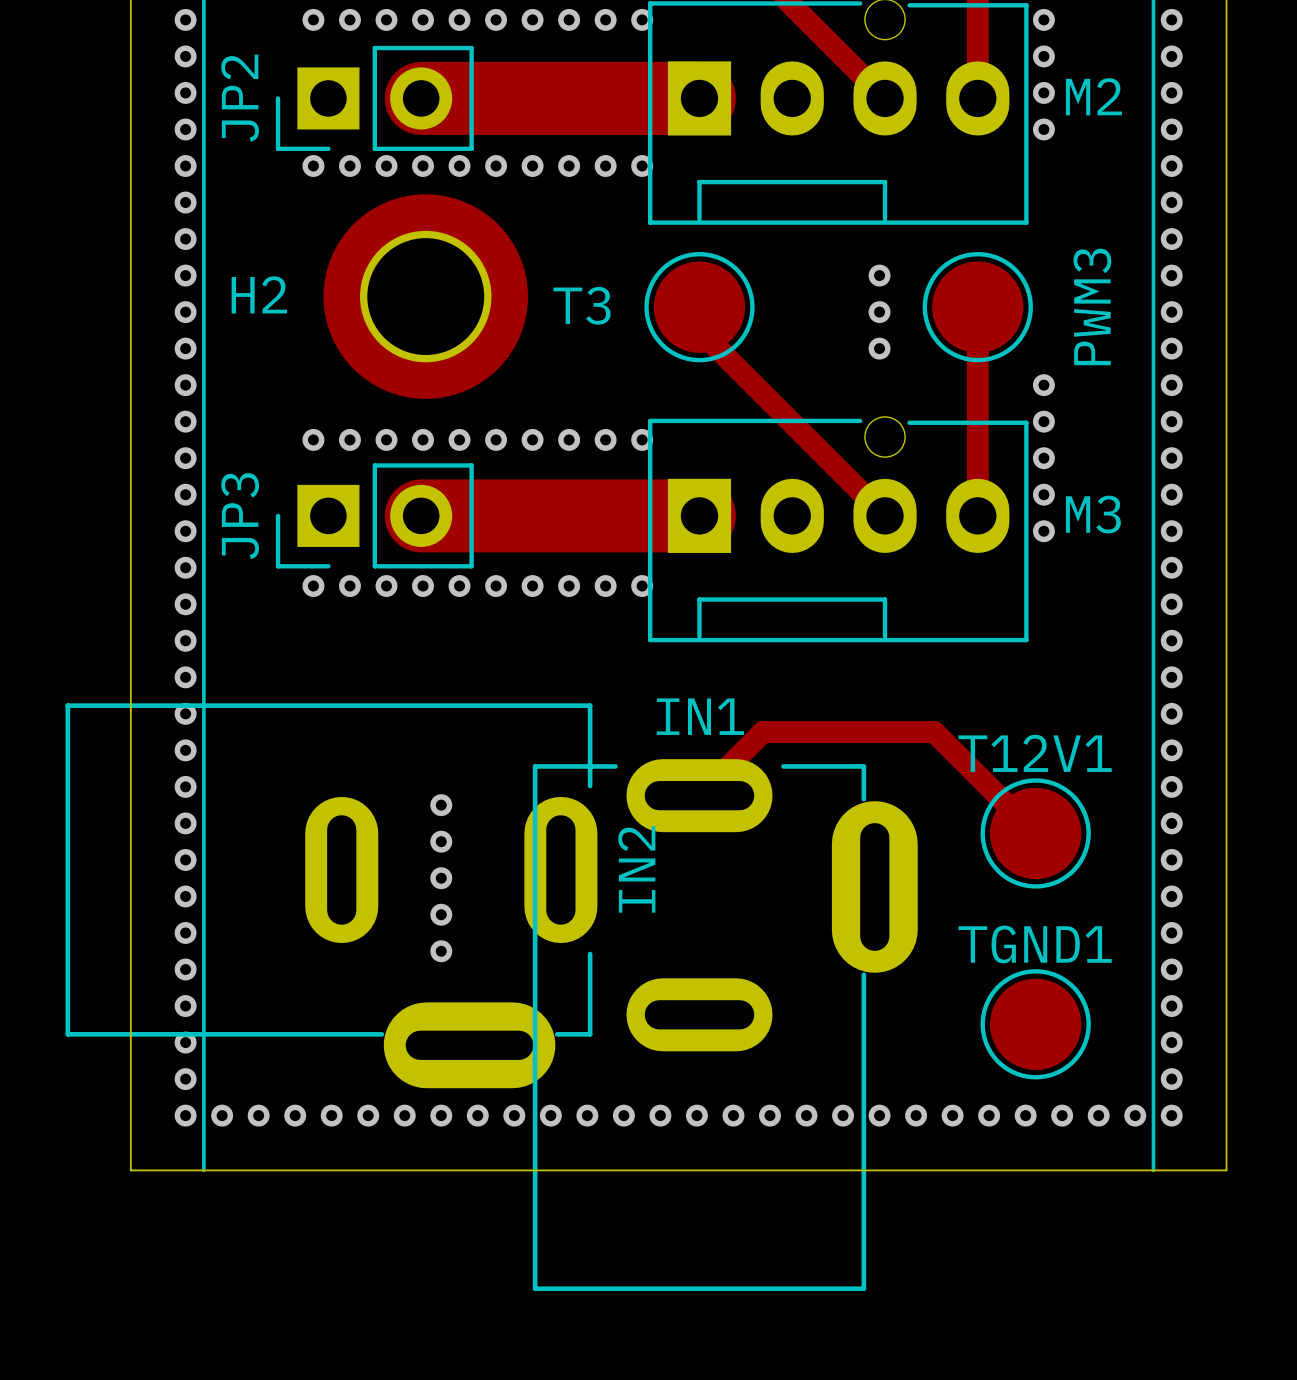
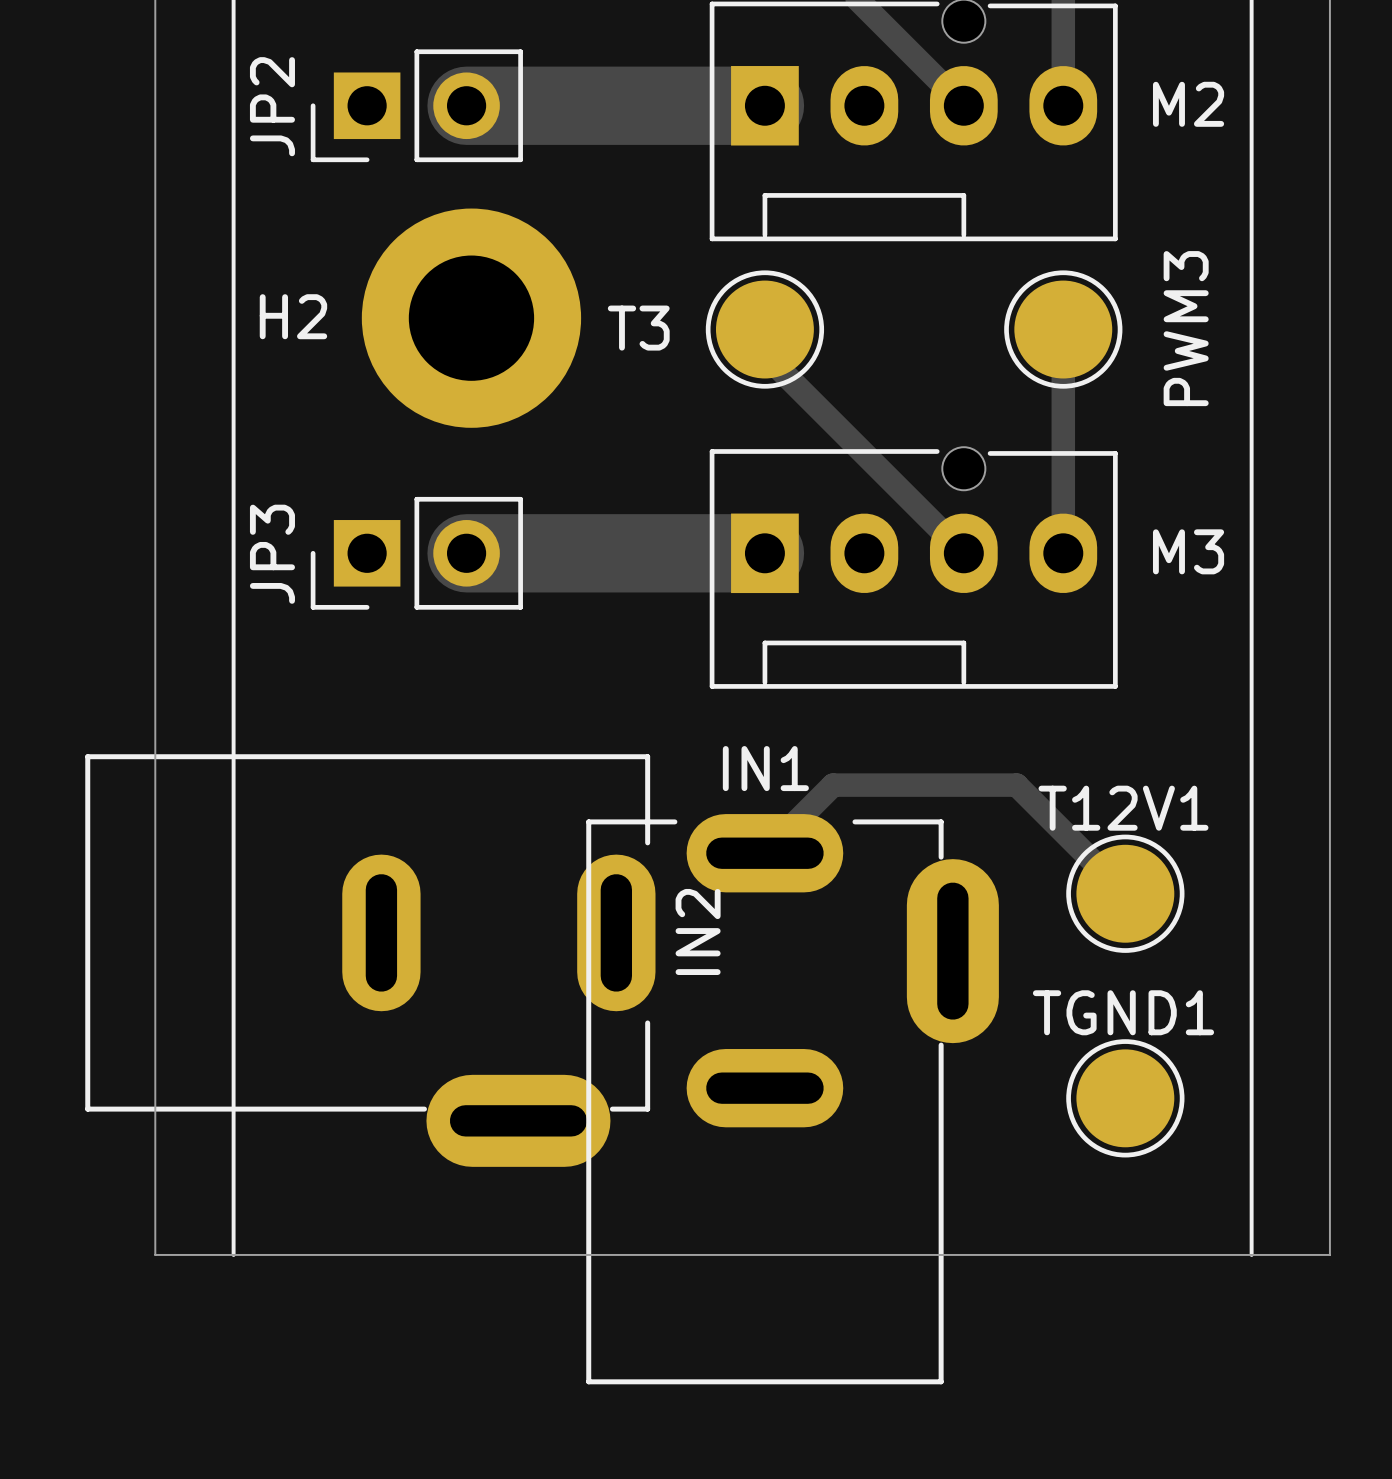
via: (185, 19) -> none
via: (313, 19) -> none
via: (349, 19) -> none
via: (386, 19) -> none
via: (423, 19) -> none
via: (459, 19) -> none
via: (496, 19) -> none
via: (532, 19) -> none
via: (569, 19) -> none
via: (605, 19) -> none
via: (642, 19) -> none
via: (1043, 19) -> none
via: (1171, 19) -> none
via: (185, 56) -> none
via: (1043, 56) -> none
via: (1171, 56) -> none
via: (185, 92) -> none
via: (1043, 92) -> none
via: (1171, 92) -> none
via: (185, 129) -> none
via: (1043, 129) -> none
via: (1171, 129) -> none
via: (185, 166) -> none
via: (313, 166) -> none
via: (349, 166) -> none
via: (386, 166) -> none
via: (423, 166) -> none
via: (459, 166) -> none
via: (496, 166) -> none
via: (532, 166) -> none
via: (569, 166) -> none
via: (605, 166) -> none
via: (642, 166) -> none
via: (1171, 166) -> none
via: (185, 202) -> none
via: (1171, 202) -> none
via: (185, 239) -> none
via: (1171, 239) -> none
via: (185, 275) -> none
via: (879, 275) -> none
via: (1171, 275) -> none
via: (185, 312) -> none
via: (879, 312) -> none
via: (1171, 312) -> none
via: (185, 348) -> none
via: (879, 348) -> none
via: (1171, 348) -> none
via: (185, 385) -> none
via: (1043, 385) -> none
via: (1171, 385) -> none
via: (185, 421) -> none
via: (1043, 421) -> none
via: (1171, 421) -> none
via: (313, 439) -> none
via: (349, 439) -> none
via: (386, 439) -> none
via: (423, 439) -> none
via: (459, 439) -> none
via: (496, 439) -> none
via: (532, 439) -> none
via: (569, 439) -> none
via: (605, 439) -> none
via: (642, 439) -> none
via: (185, 458) -> none
via: (1043, 458) -> none
via: (1171, 458) -> none
via: (185, 494) -> none
via: (1043, 494) -> none
via: (1171, 494) -> none
via: (185, 531) -> none
via: (1043, 531) -> none
via: (1171, 531) -> none
via: (185, 567) -> none
via: (1171, 567) -> none
via: (313, 586) -> none
via: (349, 586) -> none
via: (386, 586) -> none
via: (423, 586) -> none
via: (459, 586) -> none
via: (496, 586) -> none
via: (532, 586) -> none
via: (569, 586) -> none
via: (605, 586) -> none
via: (642, 586) -> none
via: (185, 604) -> none
via: (1171, 604) -> none
via: (185, 640) -> none
via: (1171, 640) -> none
via: (185, 677) -> none
via: (1171, 677) -> none
via: (185, 713) -> none
via: (1171, 713) -> none
via: (185, 750) -> none
via: (1171, 750) -> none
via: (185, 786) -> none
via: (1171, 786) -> none
via: (441, 805) -> none
via: (185, 823) -> none
via: (1171, 823) -> none
via: (441, 841) -> none
via: (185, 859) -> none
via: (1171, 859) -> none
via: (441, 878) -> none
via: (185, 896) -> none
via: (1171, 896) -> none
via: (441, 914) -> none
via: (185, 932) -> none
via: (1171, 932) -> none
via: (441, 951) -> none
via: (185, 969) -> none
via: (1171, 969) -> none
via: (185, 1006) -> none
via: (1171, 1006) -> none
via: (185, 1042) -> none
via: (1171, 1042) -> none
via: (185, 1079) -> none
via: (1171, 1079) -> none
via: (185, 1115) -> none
via: (222, 1115) -> none
via: (258, 1115) -> none
via: (295, 1115) -> none
via: (331, 1115) -> none
via: (368, 1115) -> none
via: (404, 1115) -> none
via: (441, 1115) -> none
via: (477, 1115) -> none
via: (514, 1115) -> none
via: (550, 1115) -> none
via: (587, 1115) -> none
via: (623, 1115) -> none
via: (660, 1115) -> none
via: (696, 1115) -> none
via: (733, 1115) -> none
via: (769, 1115) -> none
via: (806, 1115) -> none
via: (843, 1115) -> none
via: (879, 1115) -> none
via: (916, 1115) -> none
via: (952, 1115) -> none
via: (989, 1115) -> none
via: (1025, 1115) -> none
via: (1062, 1115) -> none
via: (1098, 1115) -> none
via: (1135, 1115) -> none
via: (1171, 1115) -> none

